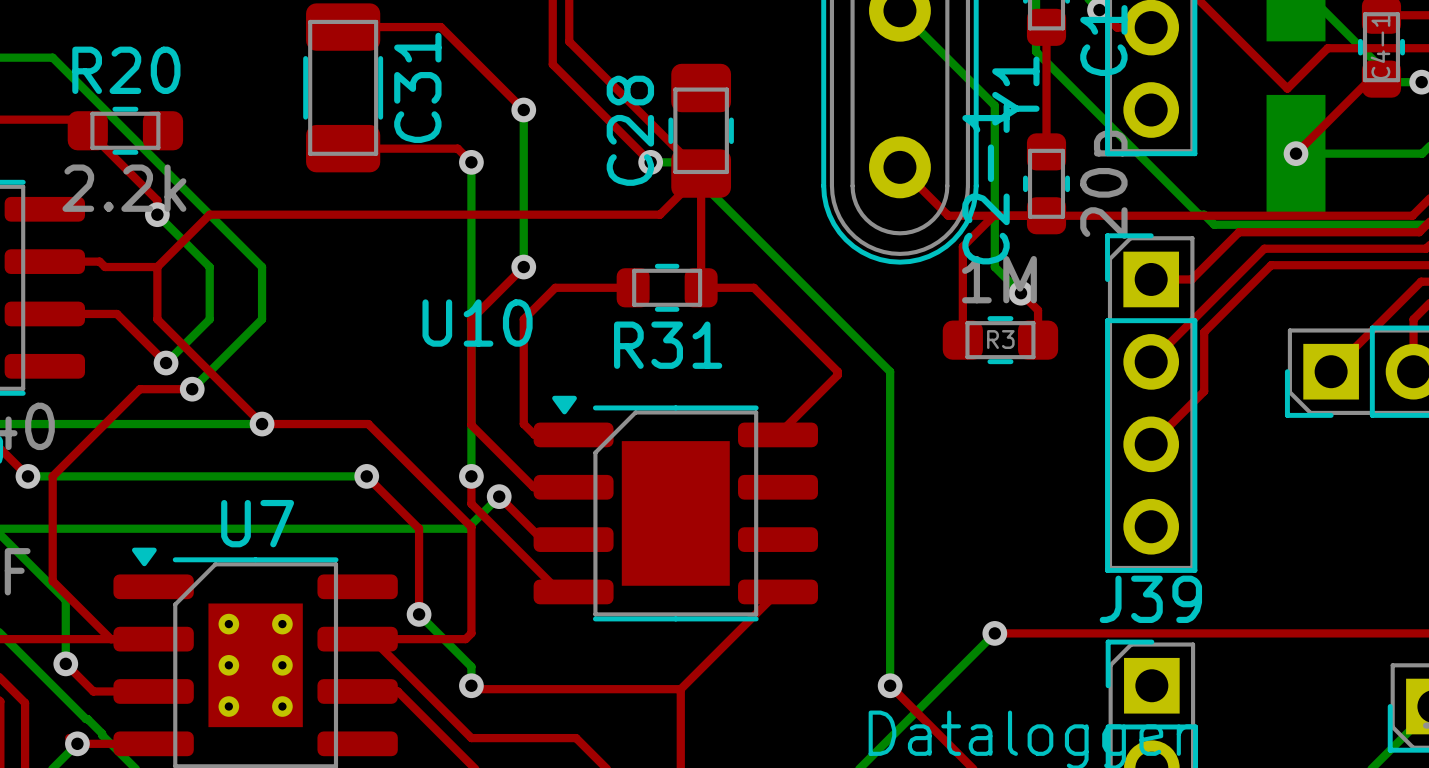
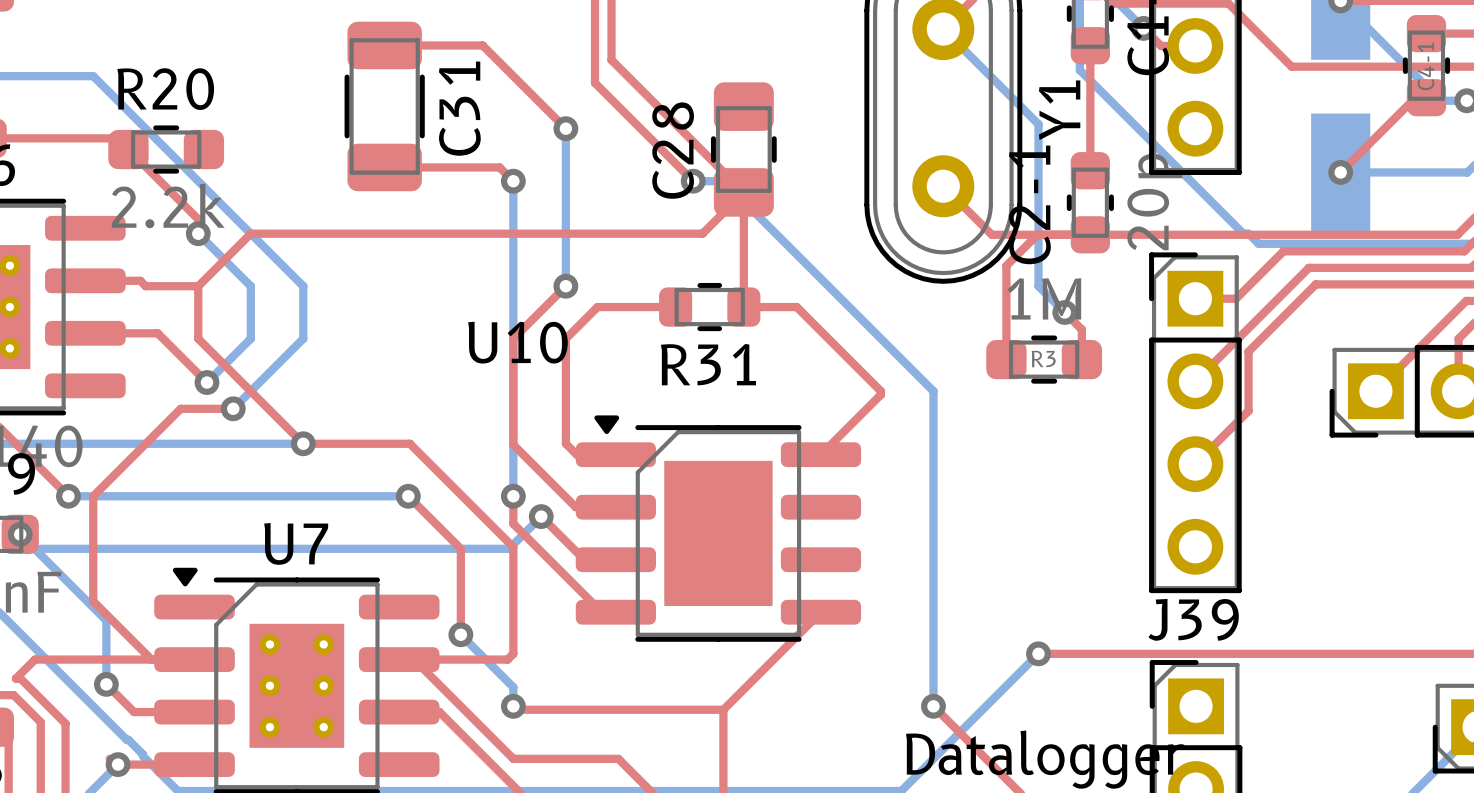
top track: (1247, 48) (1287, 88) (1327, 48) -> (1291, 66) (1372, 66)

